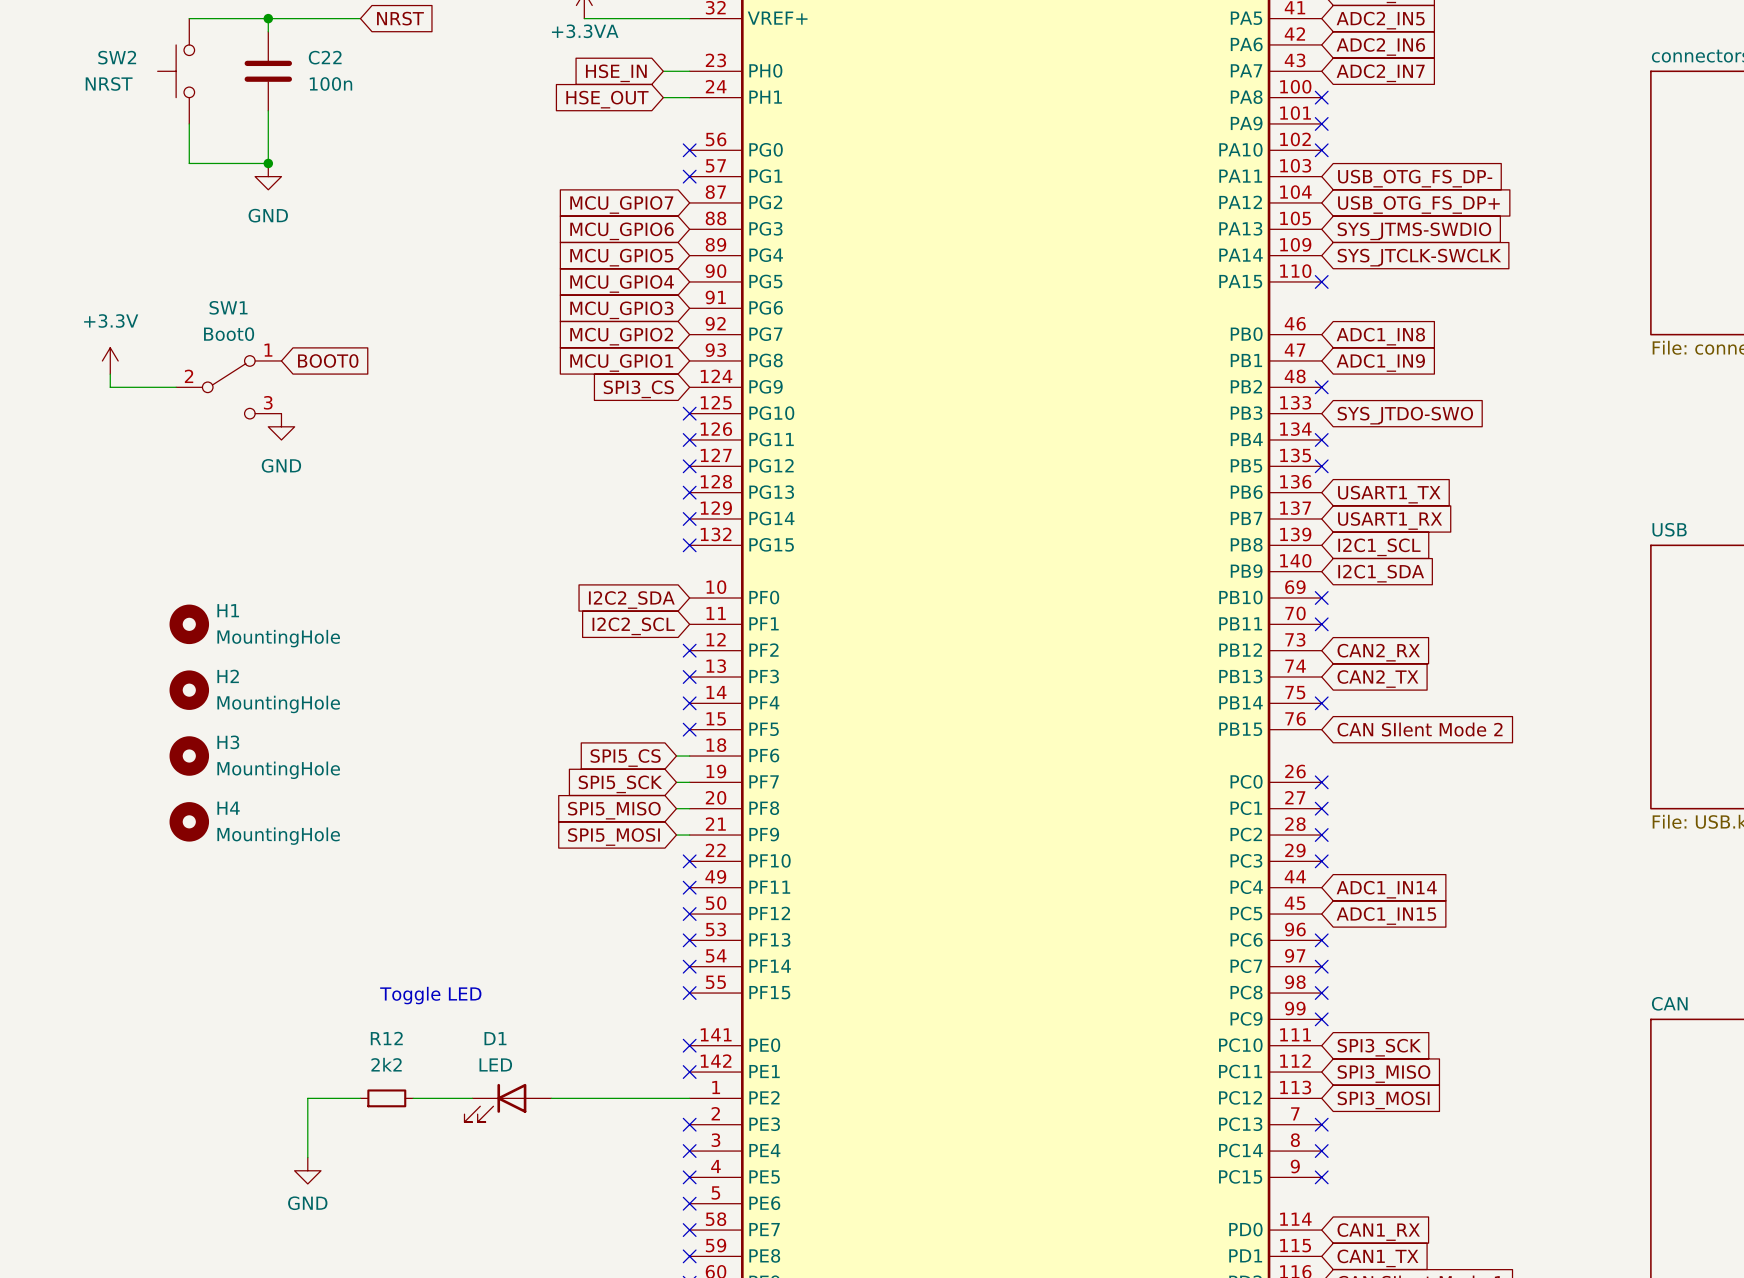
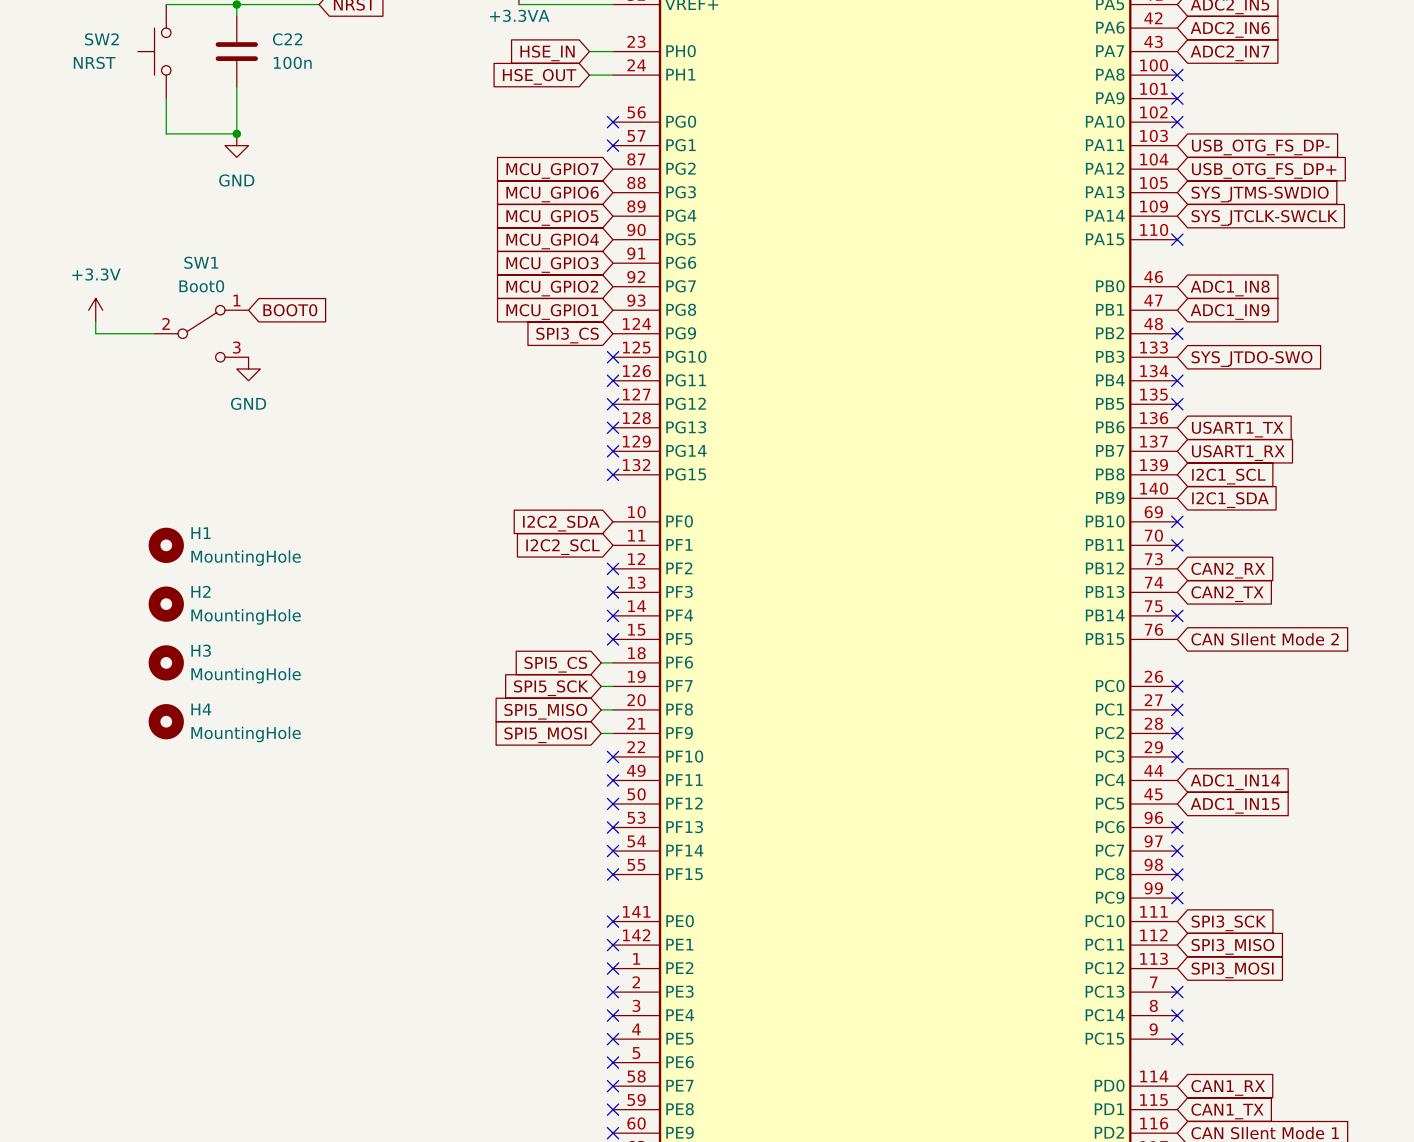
text: Toggle LED (430, 995) -> none
wire: (360, 1098) (307, 1098) (307, 1157) -> none
R12: 2k2 (386, 1098) -> none
wire: (413, 1098) (472, 1098) -> none
wire: (551, 1098) (689, 1098) -> none
no-connect mark: none -> (613, 968)
D1: LED (507, 1102) -> none
power symbol: GND (307, 1170) -> none

